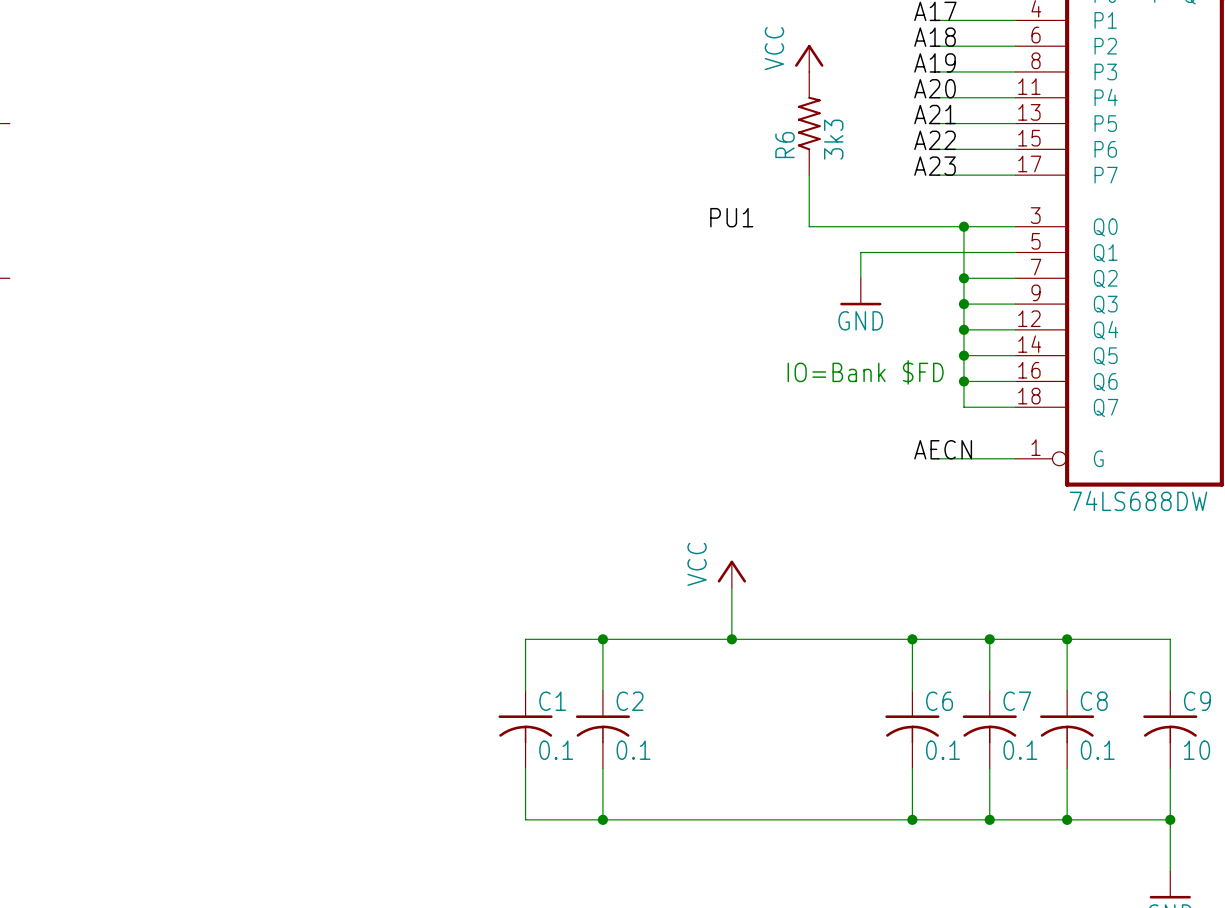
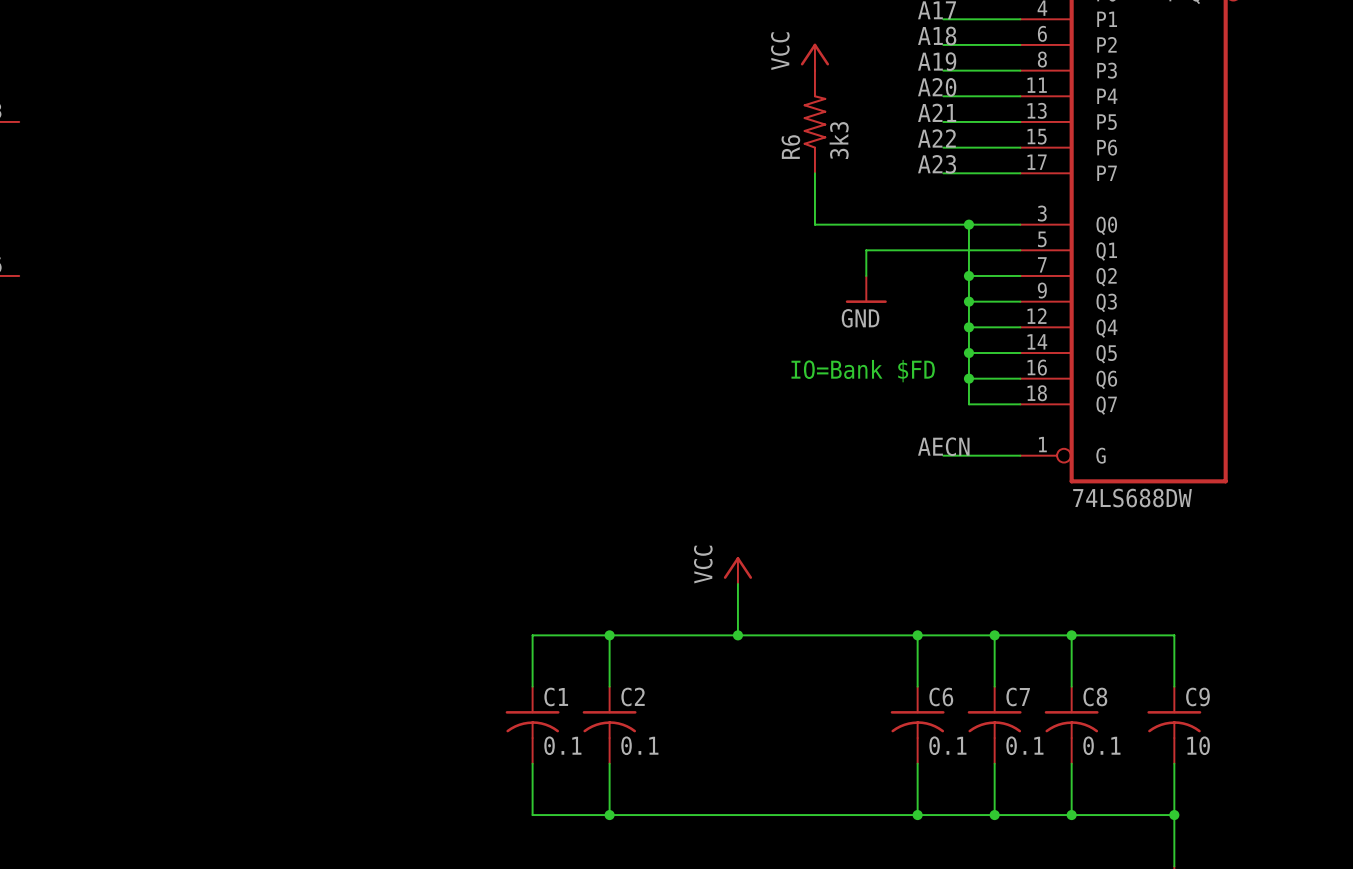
label: PU1 (731, 217) -> none

